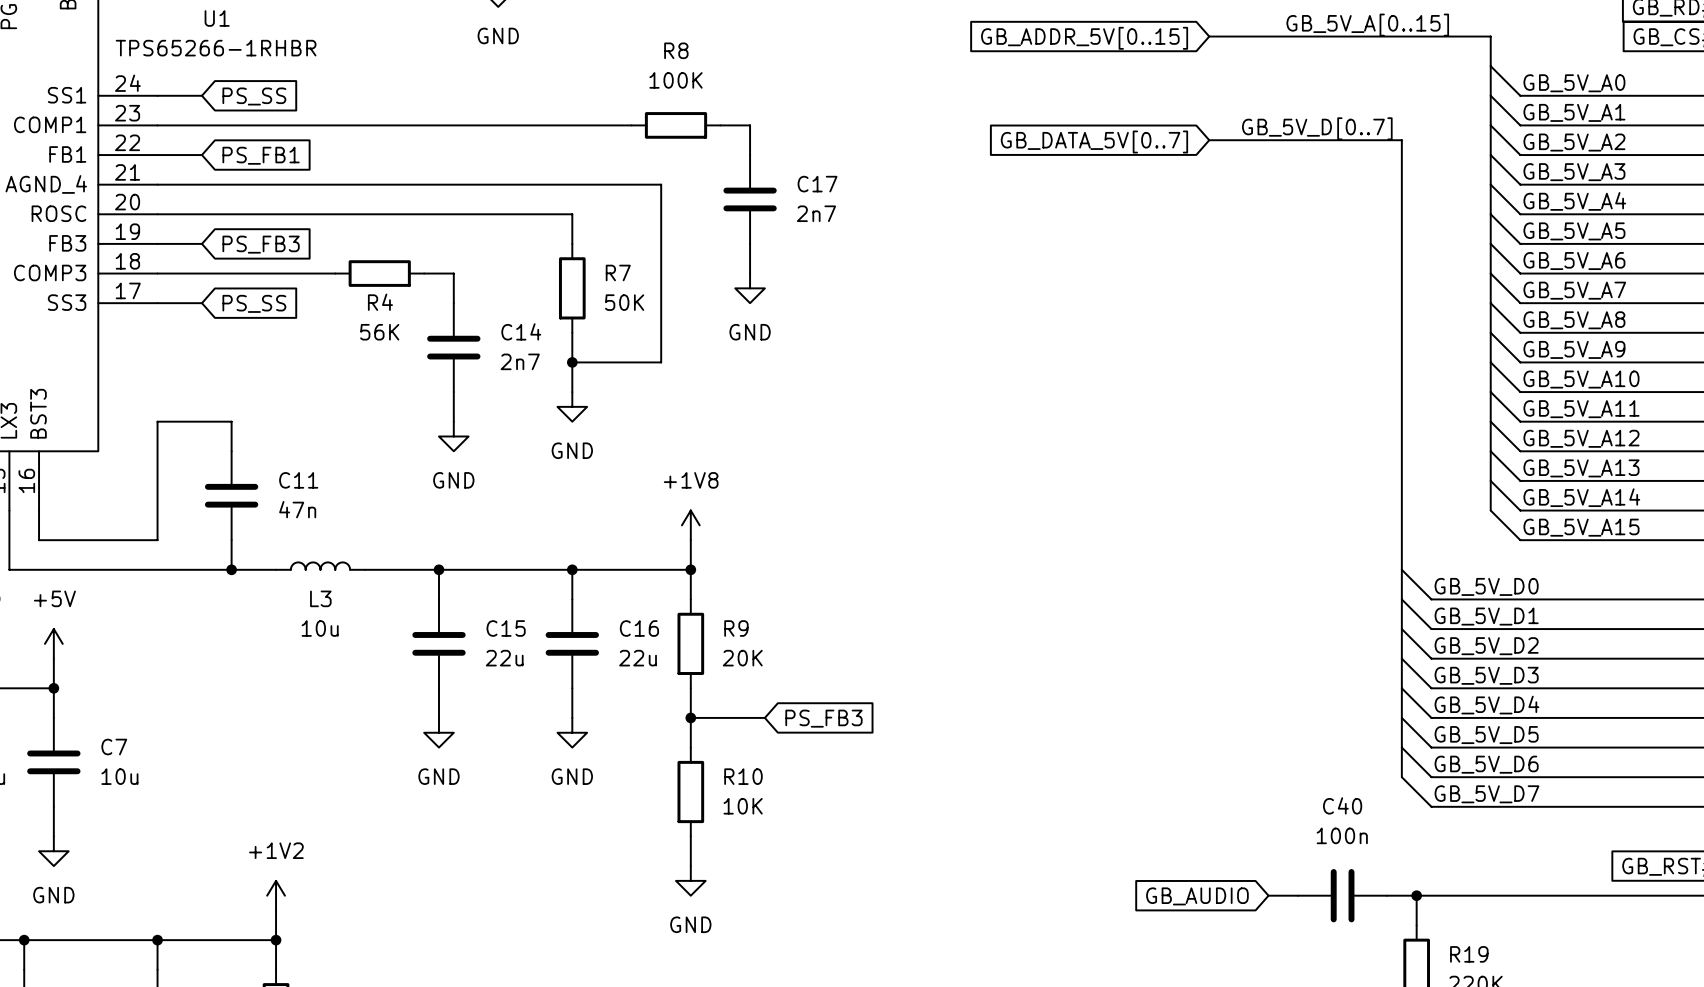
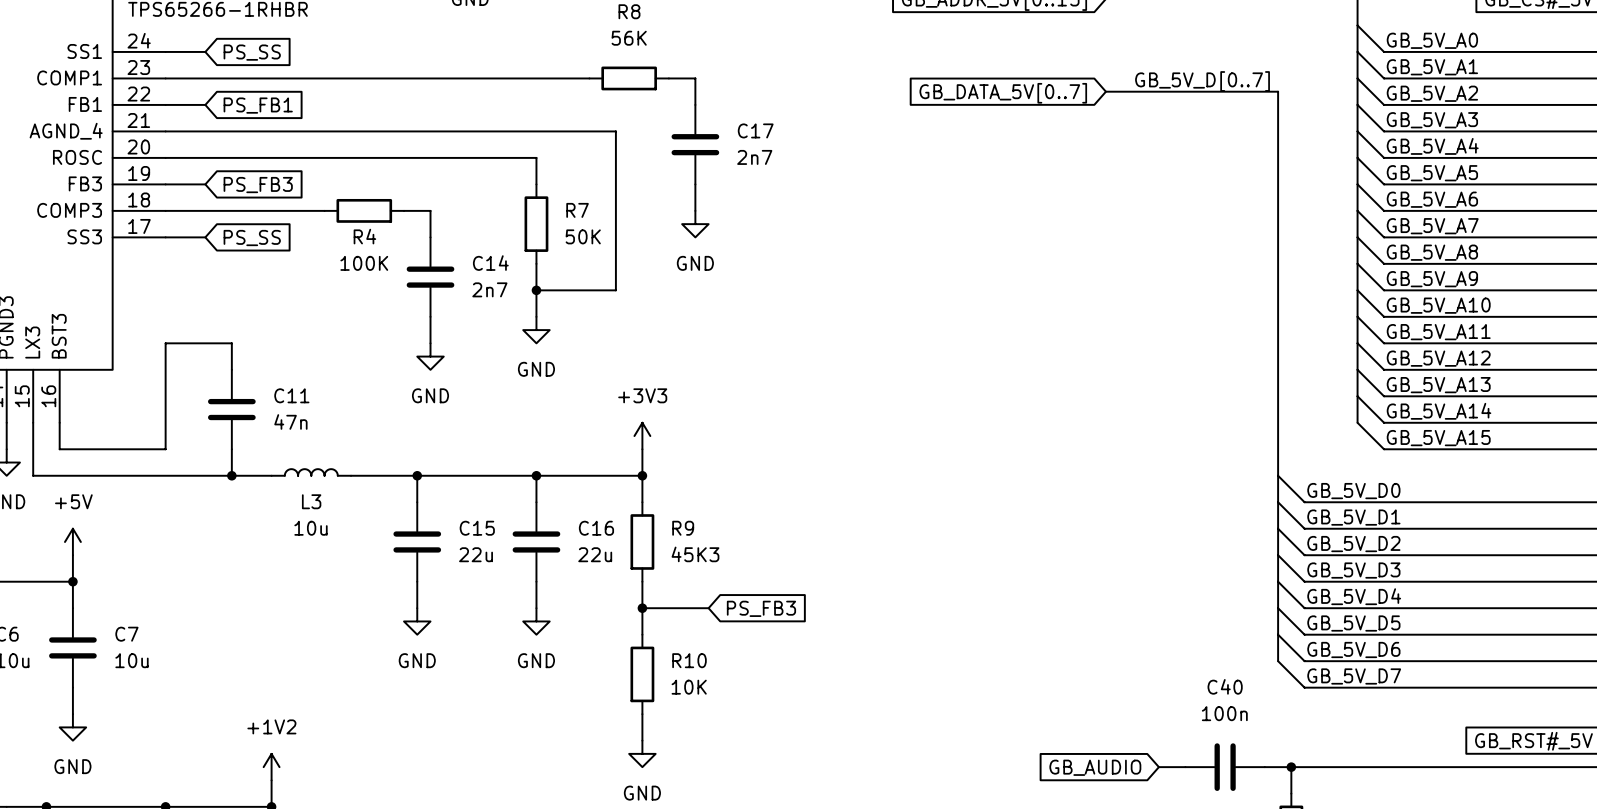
R8 value: 100K (676, 80) -> 56K (629, 38)
R4 value: 56K (379, 332) -> 100K (364, 263)
power symbol: +1V8 (690, 525) -> +3V3 (642, 436)
R9 value: 20K (742, 658) -> 45K3 (695, 554)

